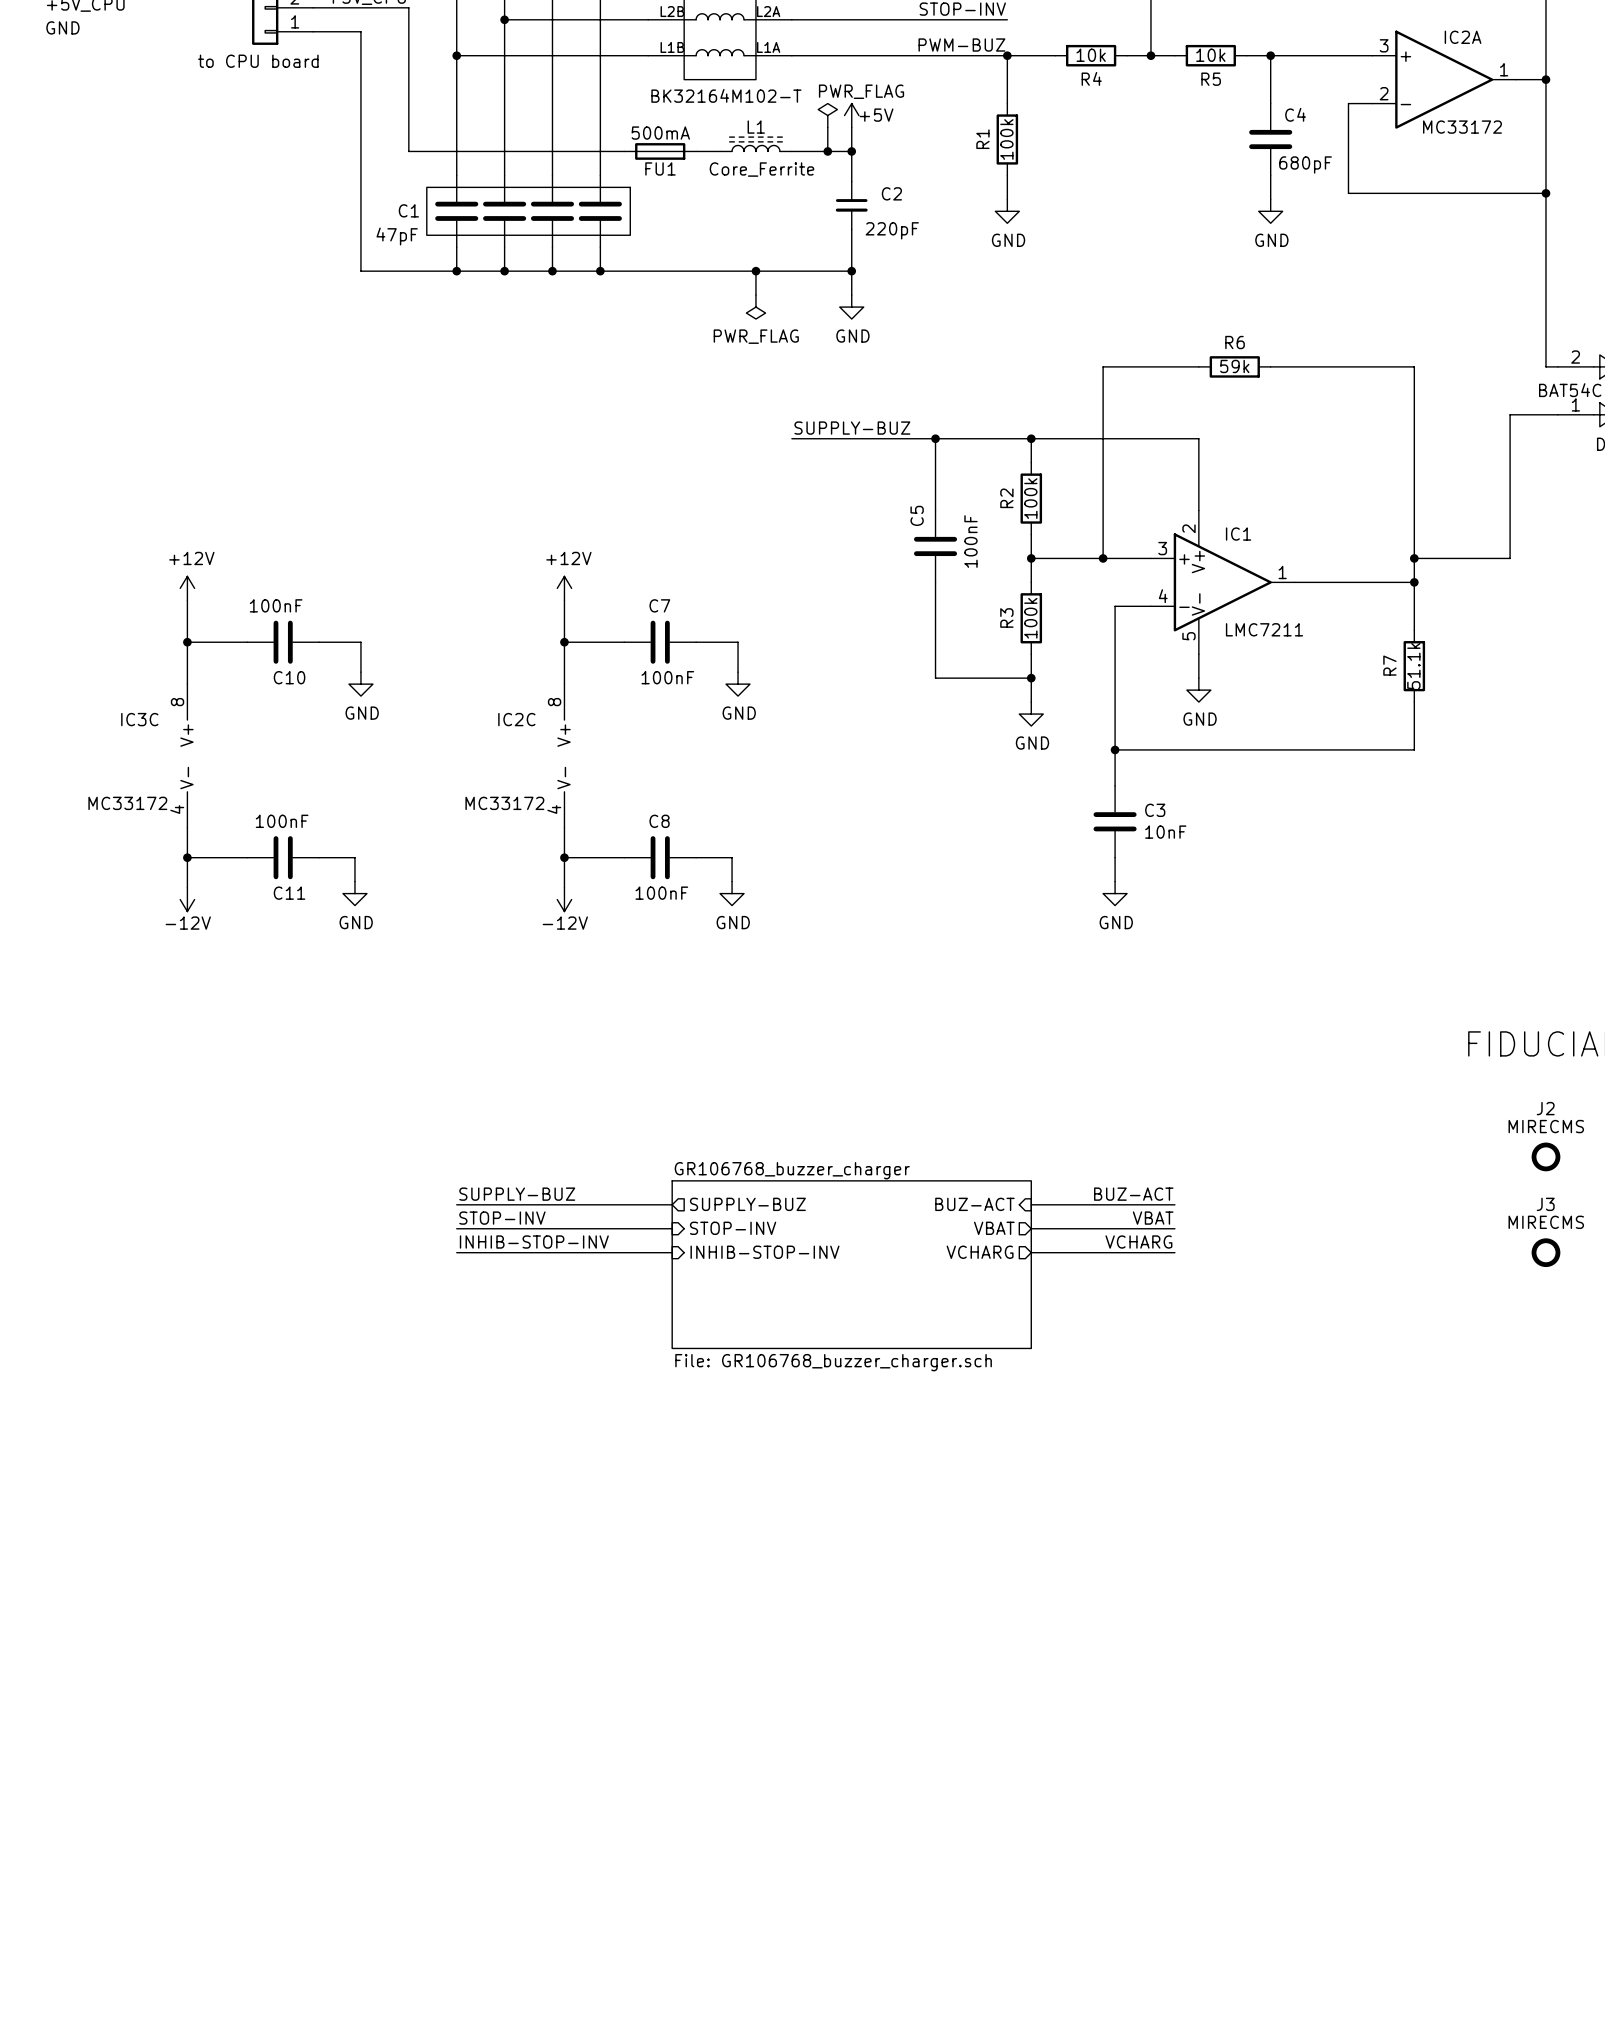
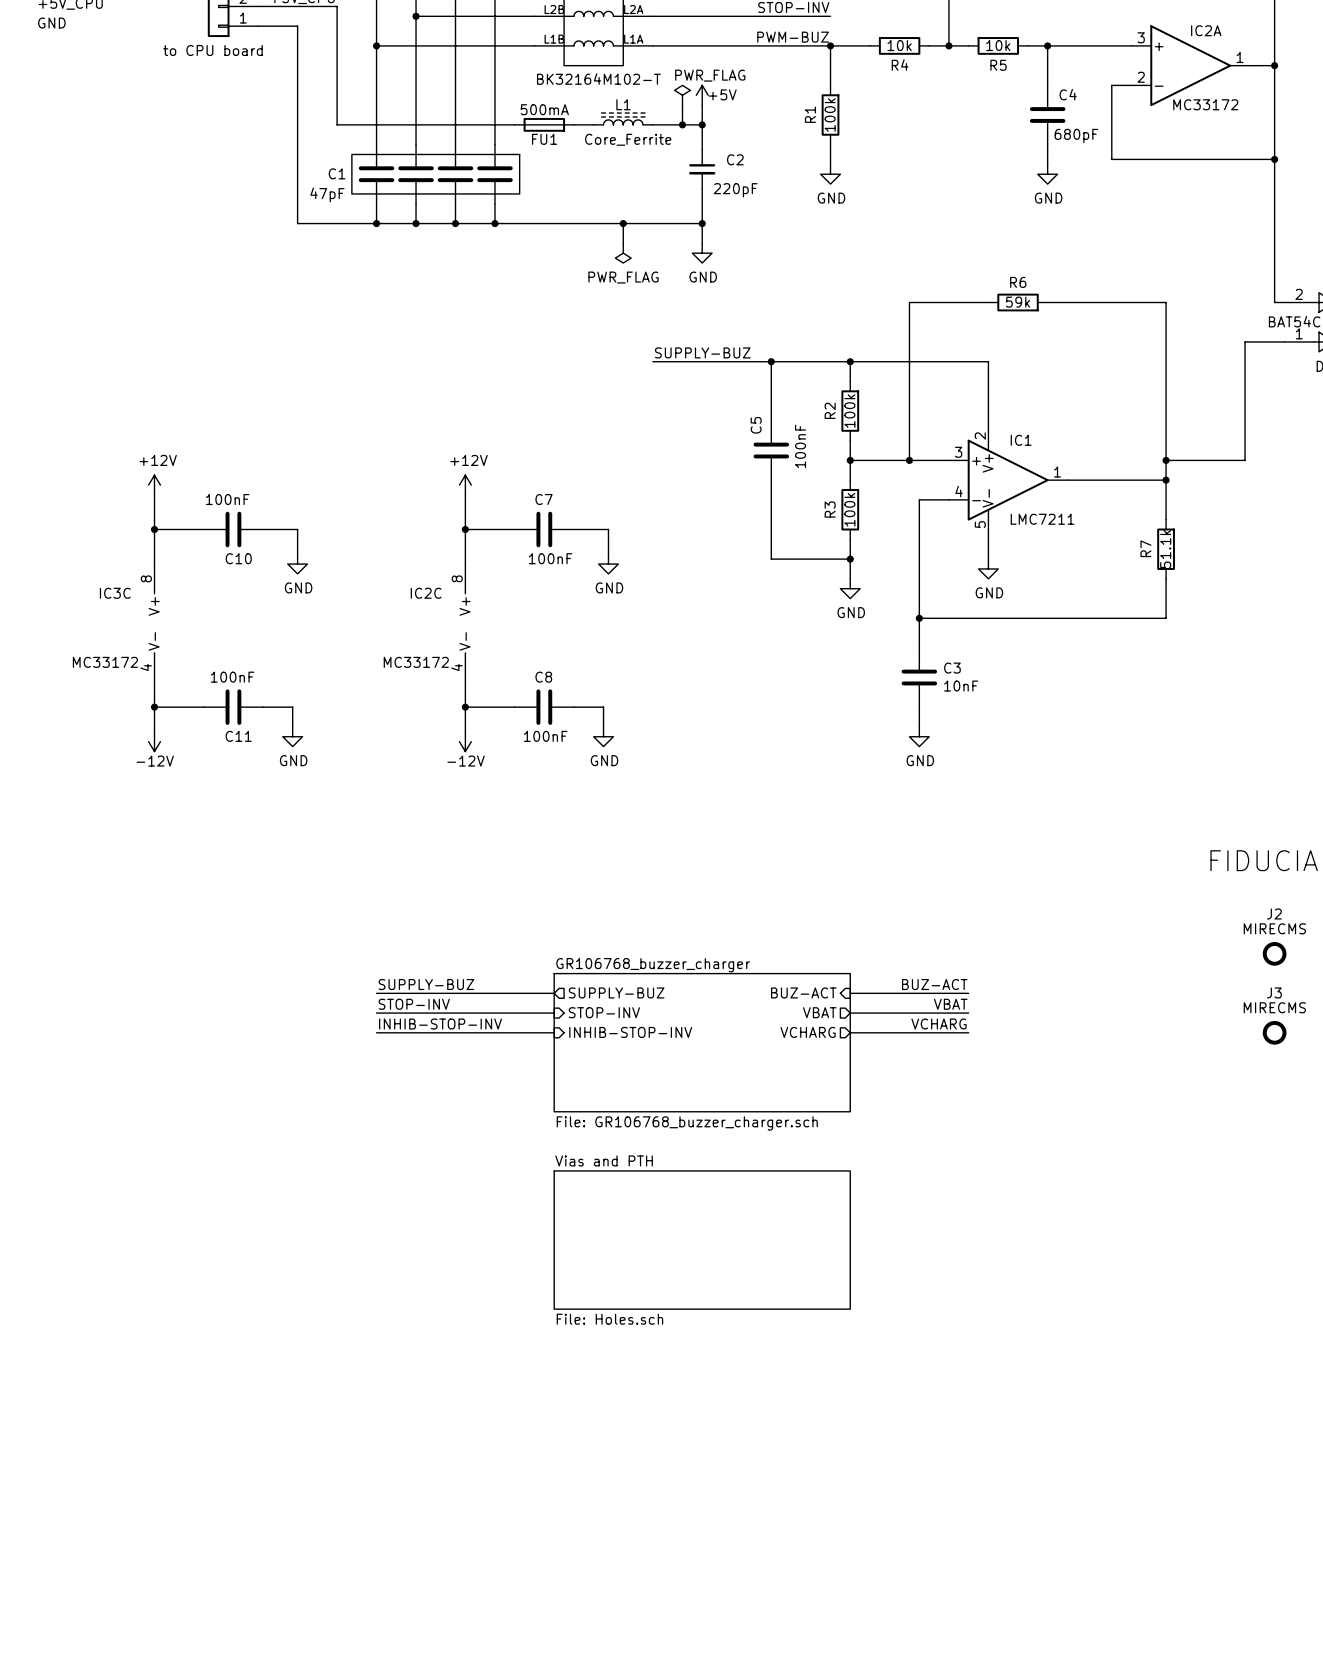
sheet Vias and PTH: none -> File: Holes.sch (702, 1240)

